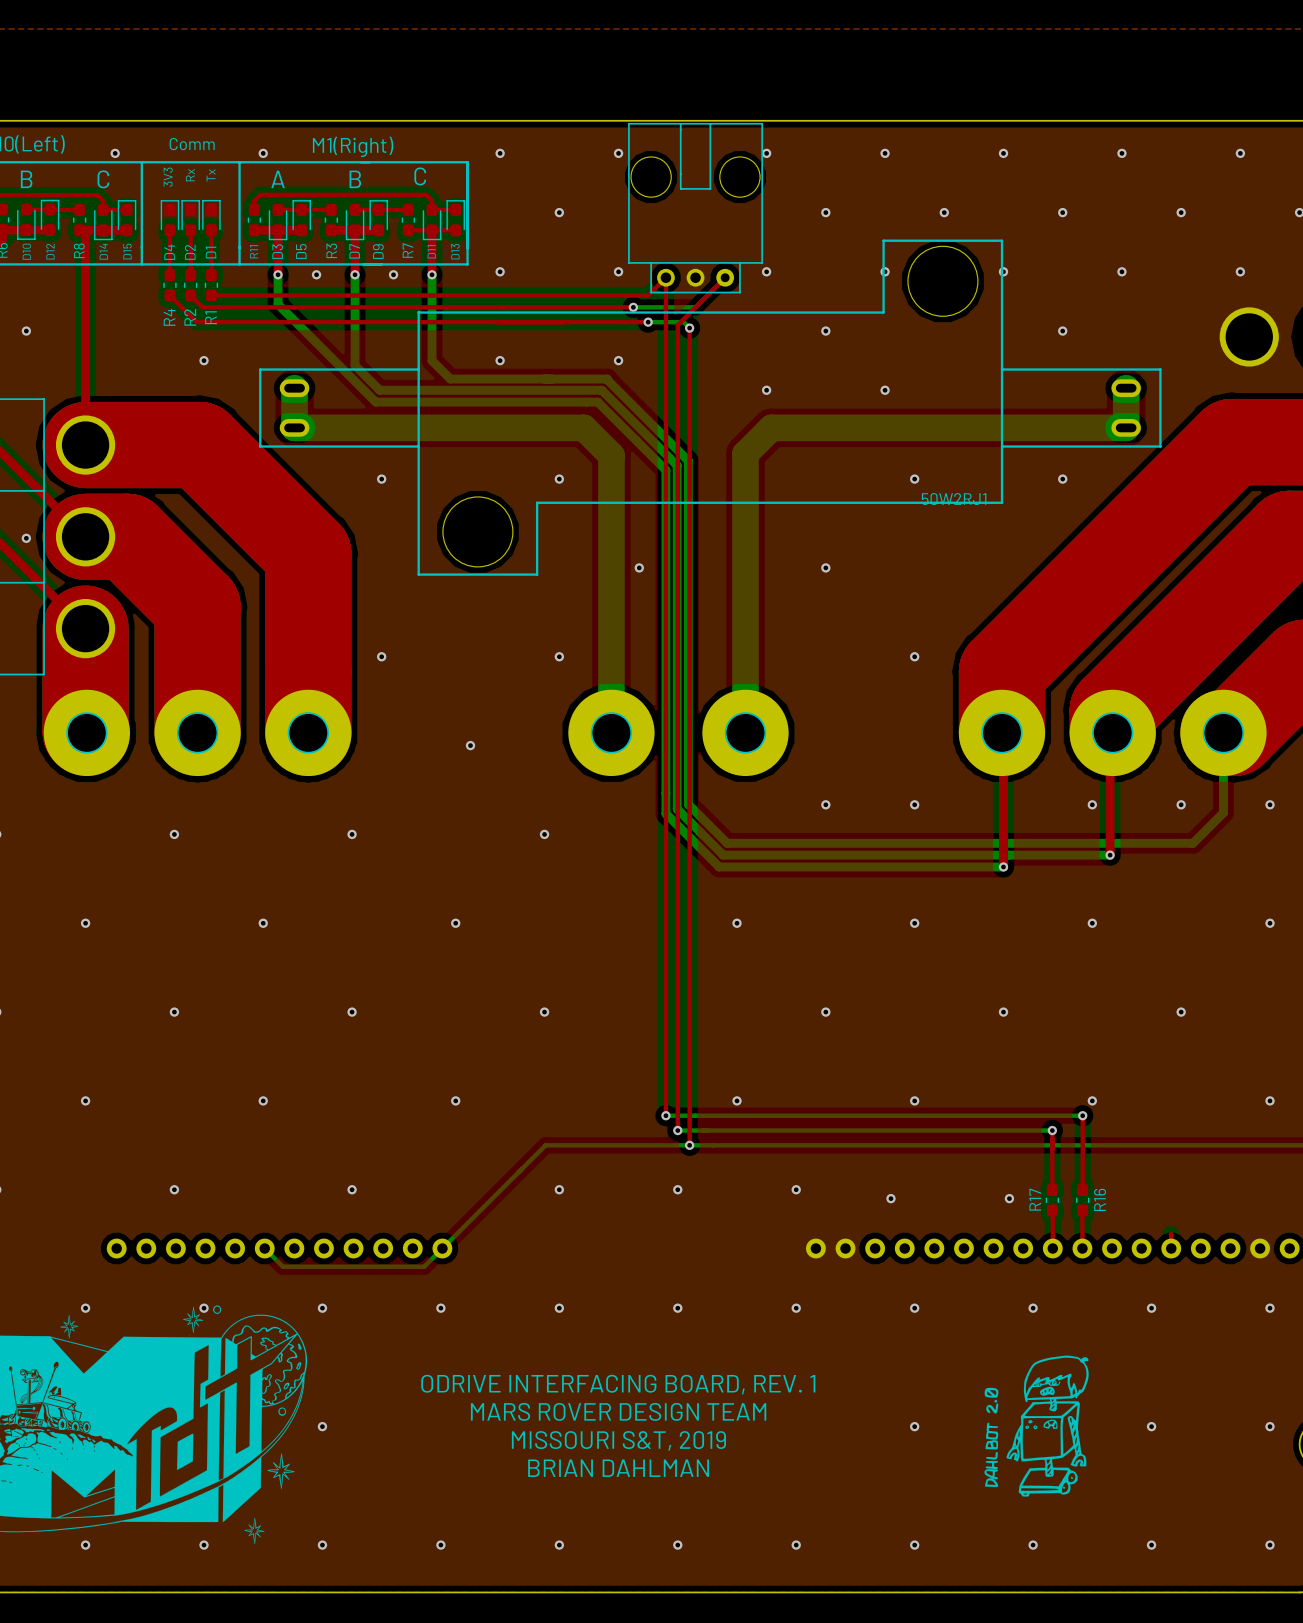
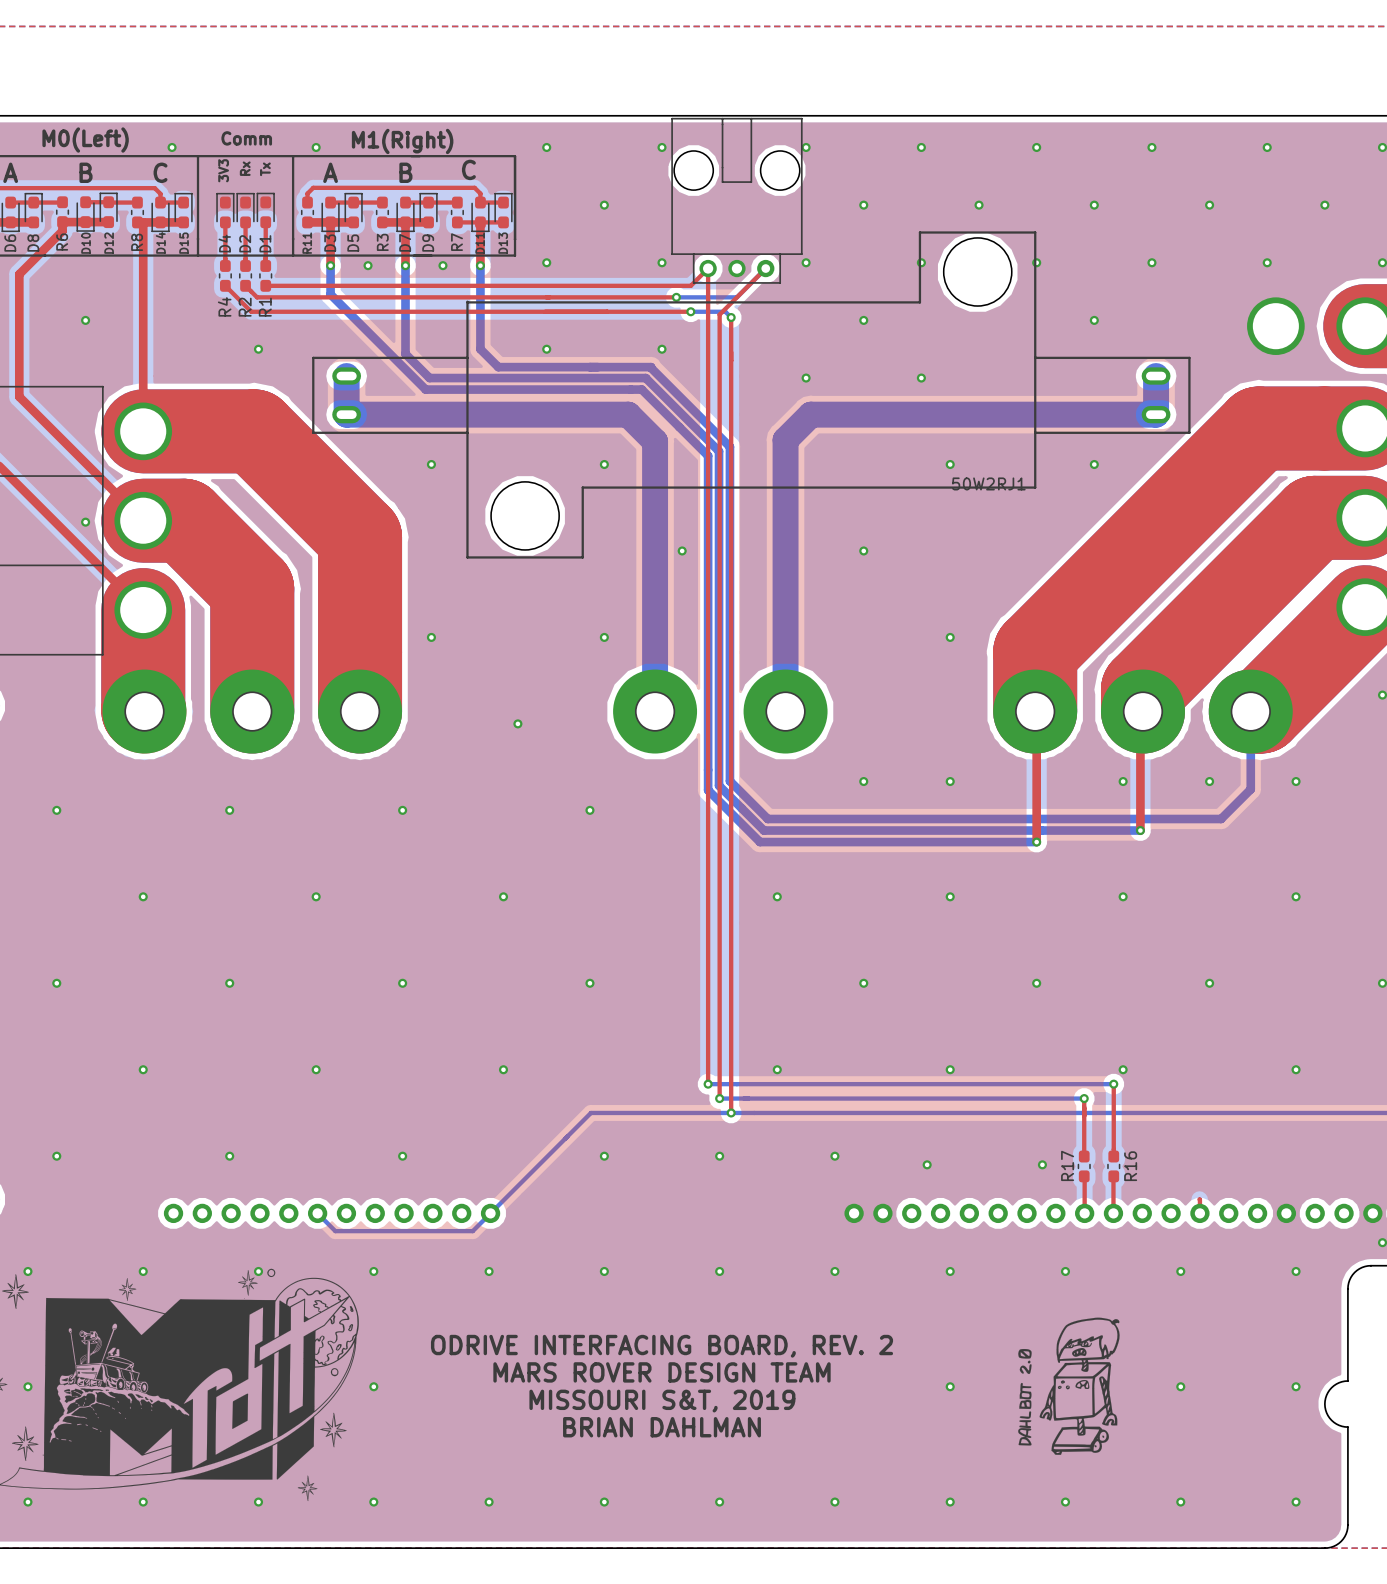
text: ODRIVE INTERFACING BOARD, REV. 1 (618, 1384) -> ODRIVE INTERFACING BOARD, REV. 2 (662, 1346)

